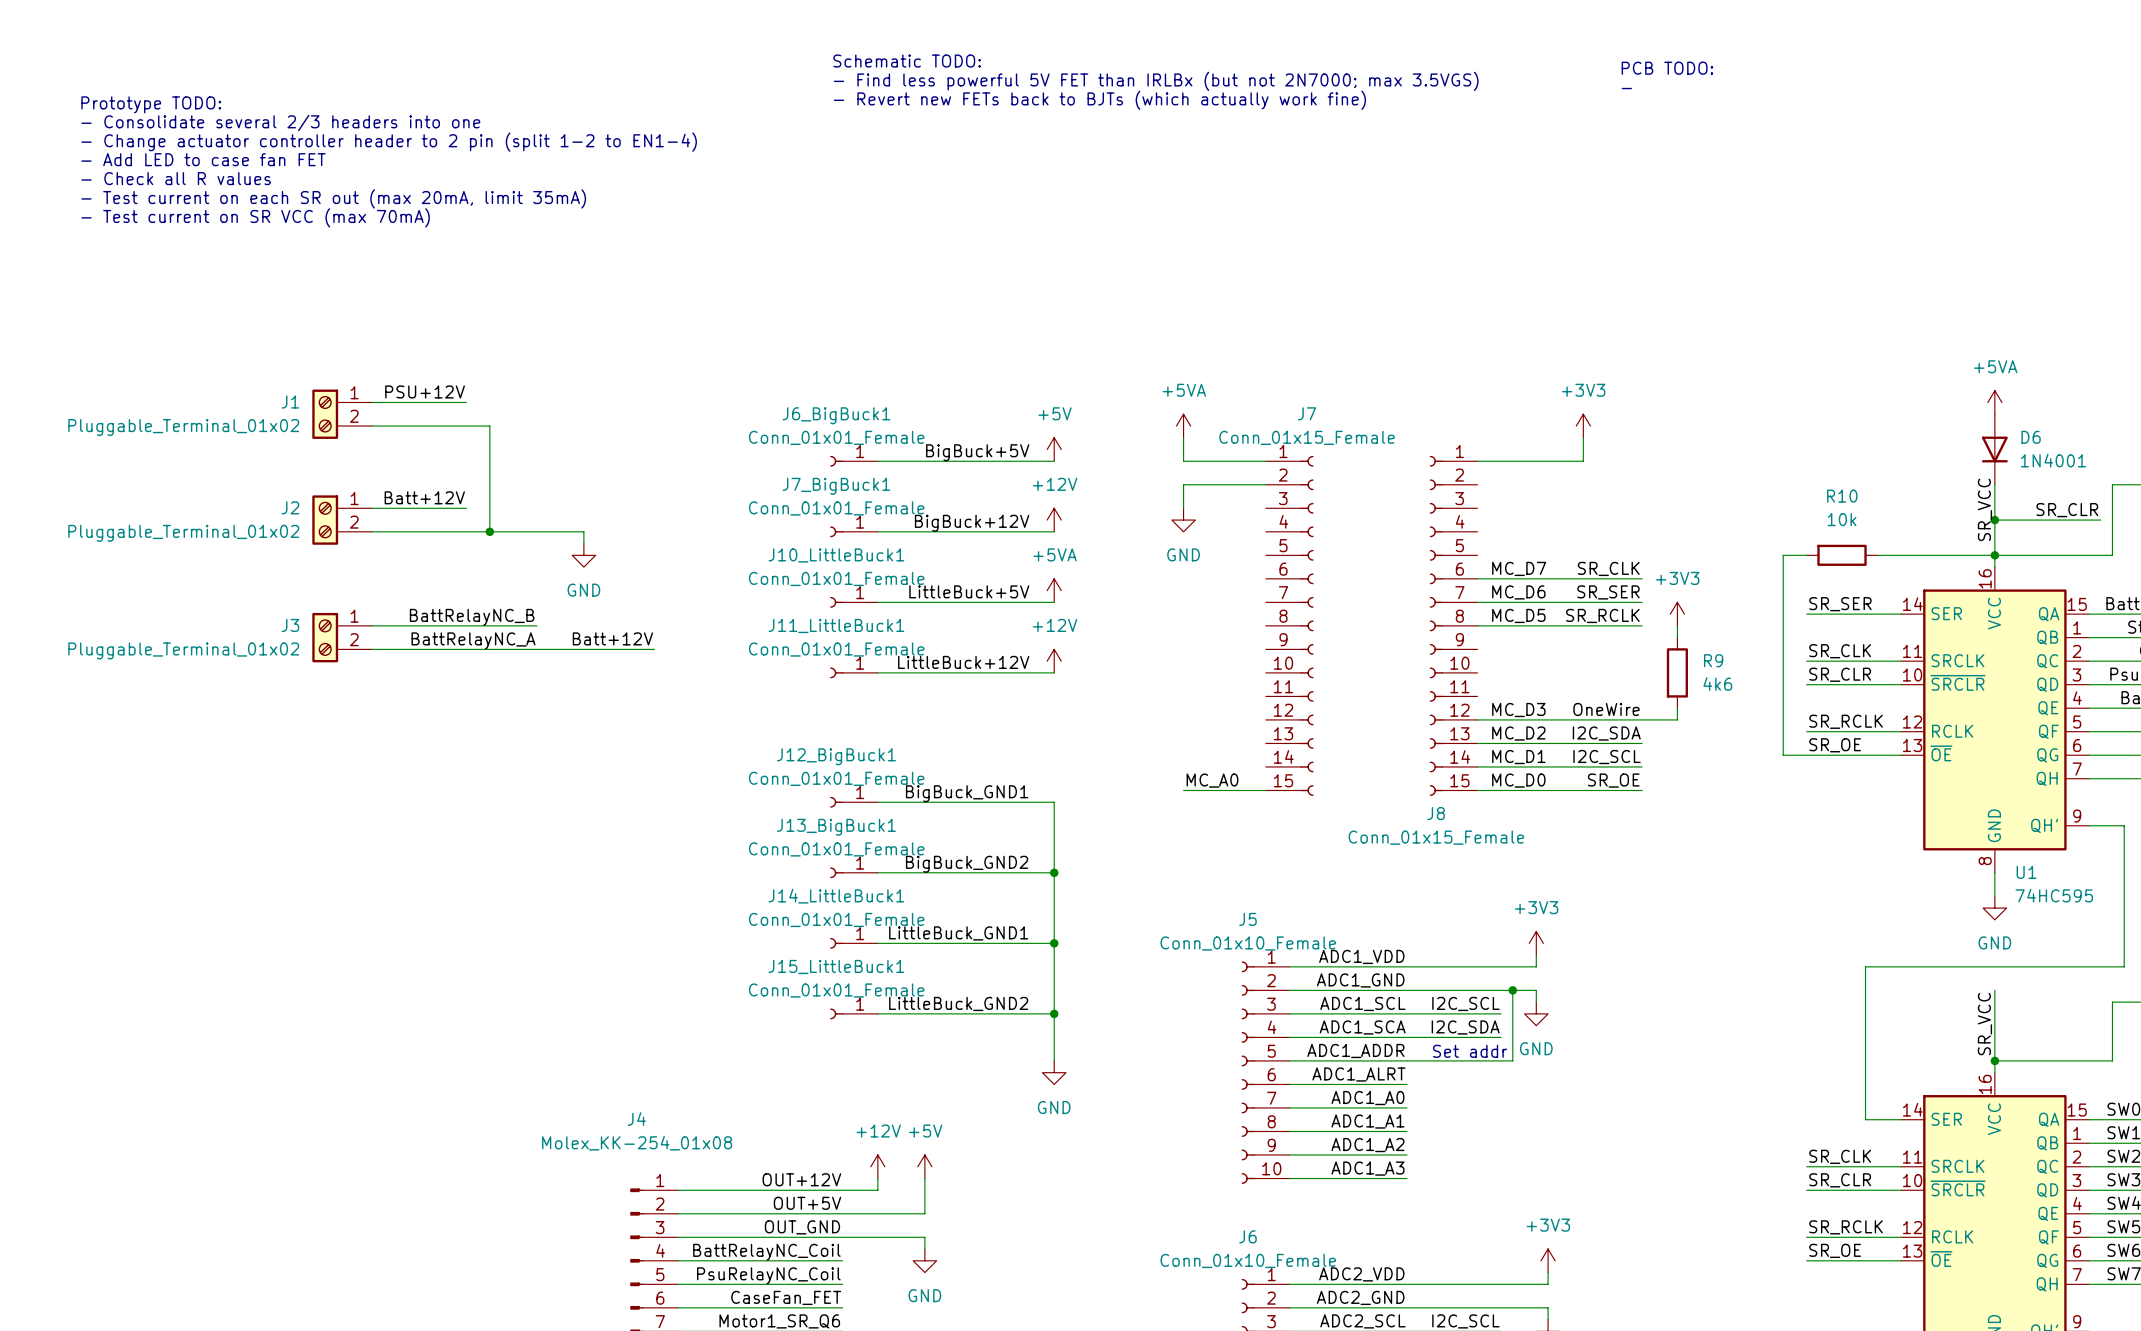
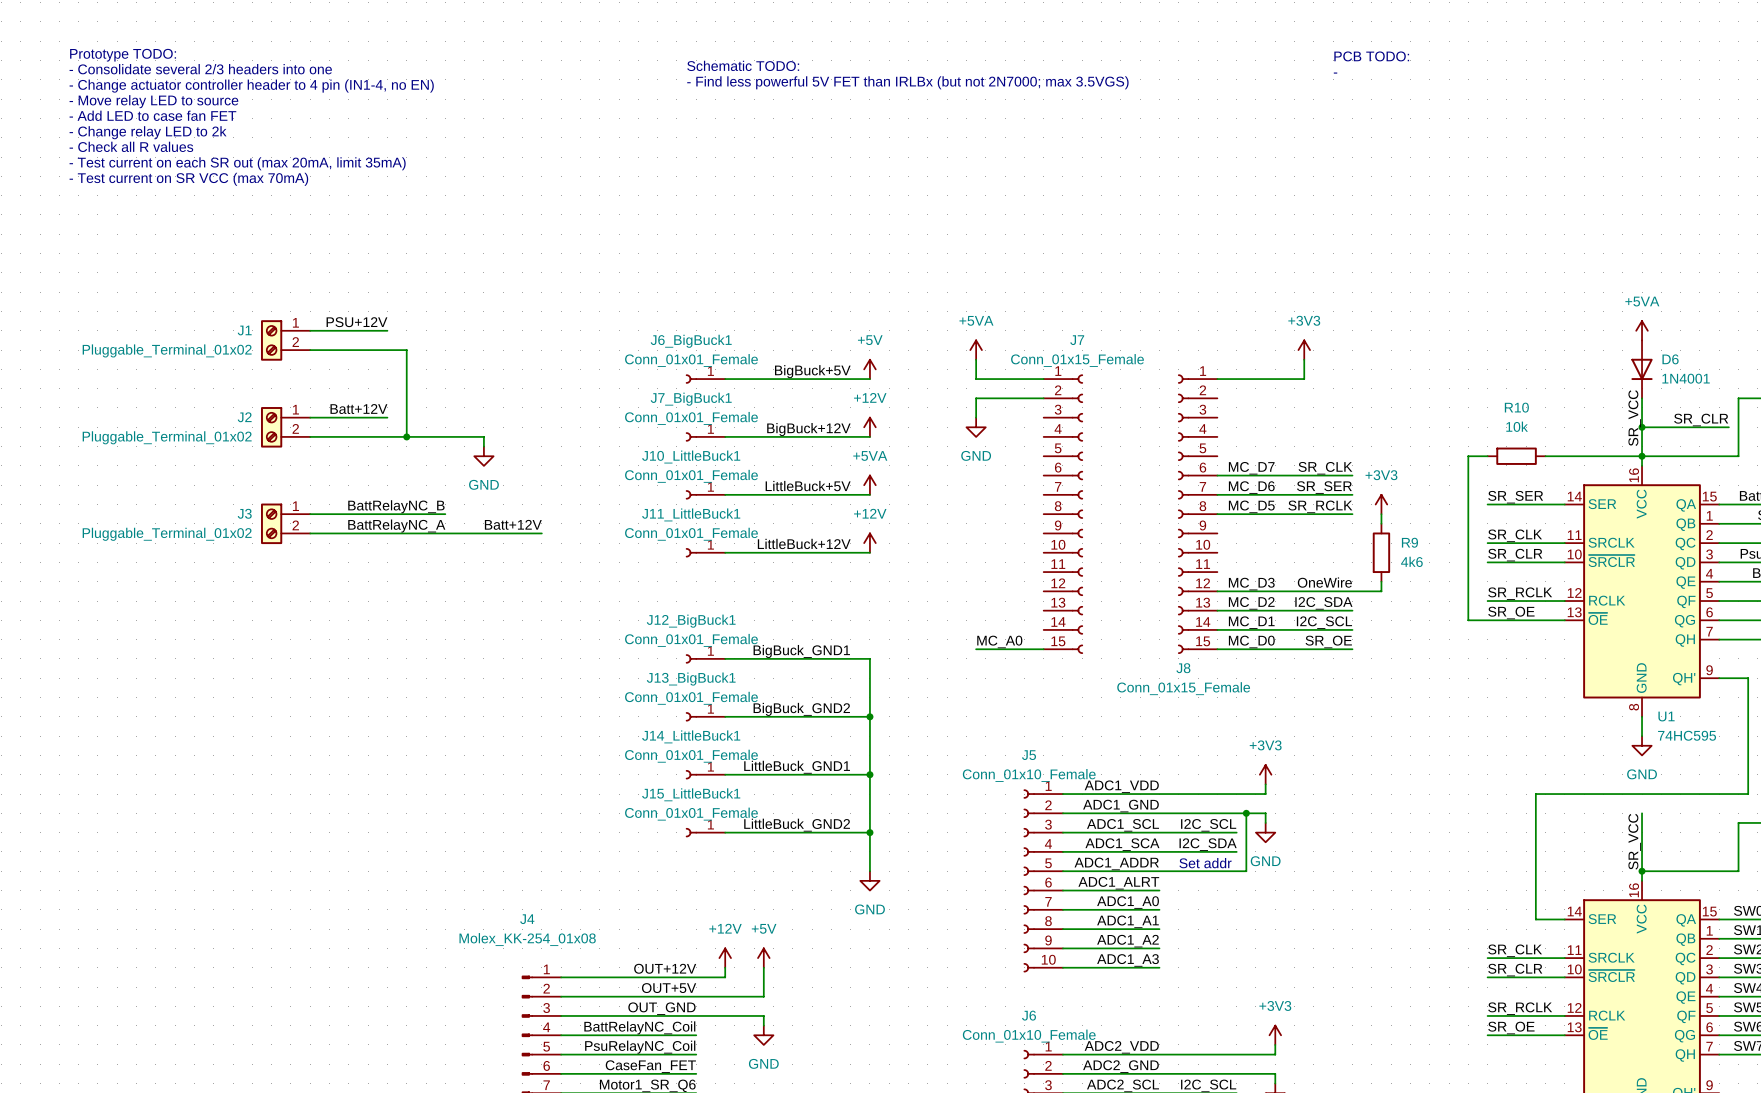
text: Schematic TODO: (907, 61) -> none
text: none -> Prototype TODO: (123, 55)
text: - Find less powerful 5V FET than IRLBx (but not 2N7000; max 3.5VGS) (1156, 81) -> Schematic TODO: (743, 65)
text: none -> - Consolidate several 2/3 headers into one (200, 69)
text: - Revert new FETs back to BJTs (which actually work fine) (1099, 100) -> - Find less powerful 5V FET than IRLBx (but not 2N7000; max 3.5VGS) (907, 82)
text: Prototype TODO: (151, 104) -> - Change actuator controller header to 4 pin (IN1-4, no EN) (251, 86)
text: - Consolidate several 2/3 headers into one (280, 122) -> - Move relay LED to source (153, 101)
text: - Change actuator controller header to 2 pin (split 1-2 to EN1-4) (389, 142) -> - Add LED to case fan FET (152, 115)
text: - Add LED to case fan FET (203, 159) -> - Change relay LED to 2k (148, 132)

